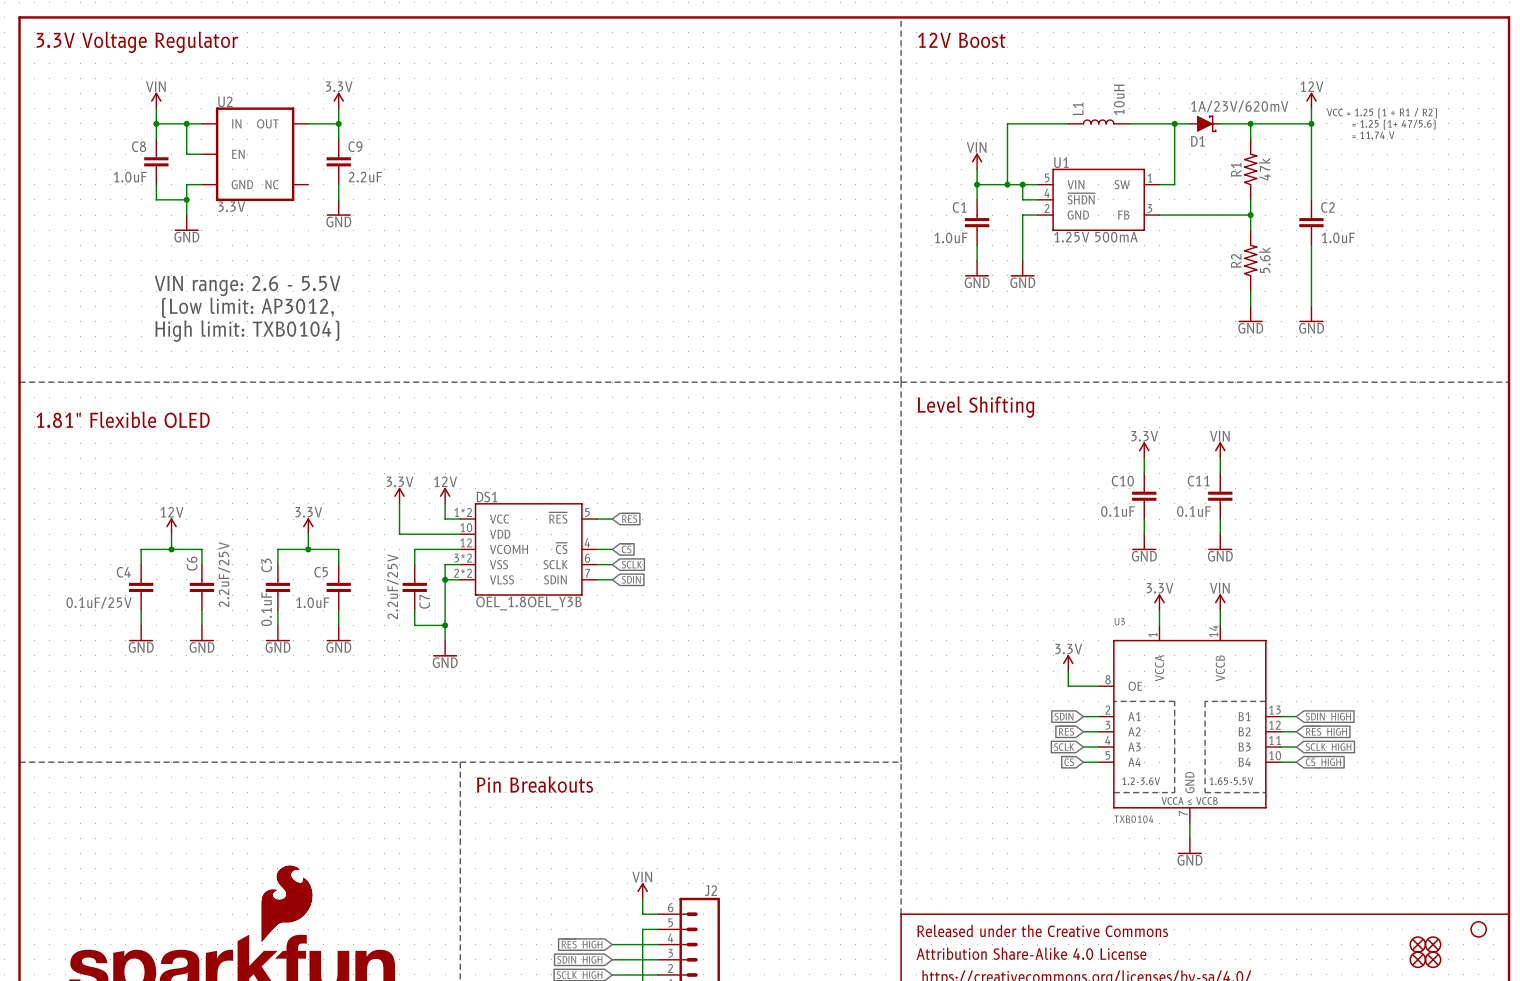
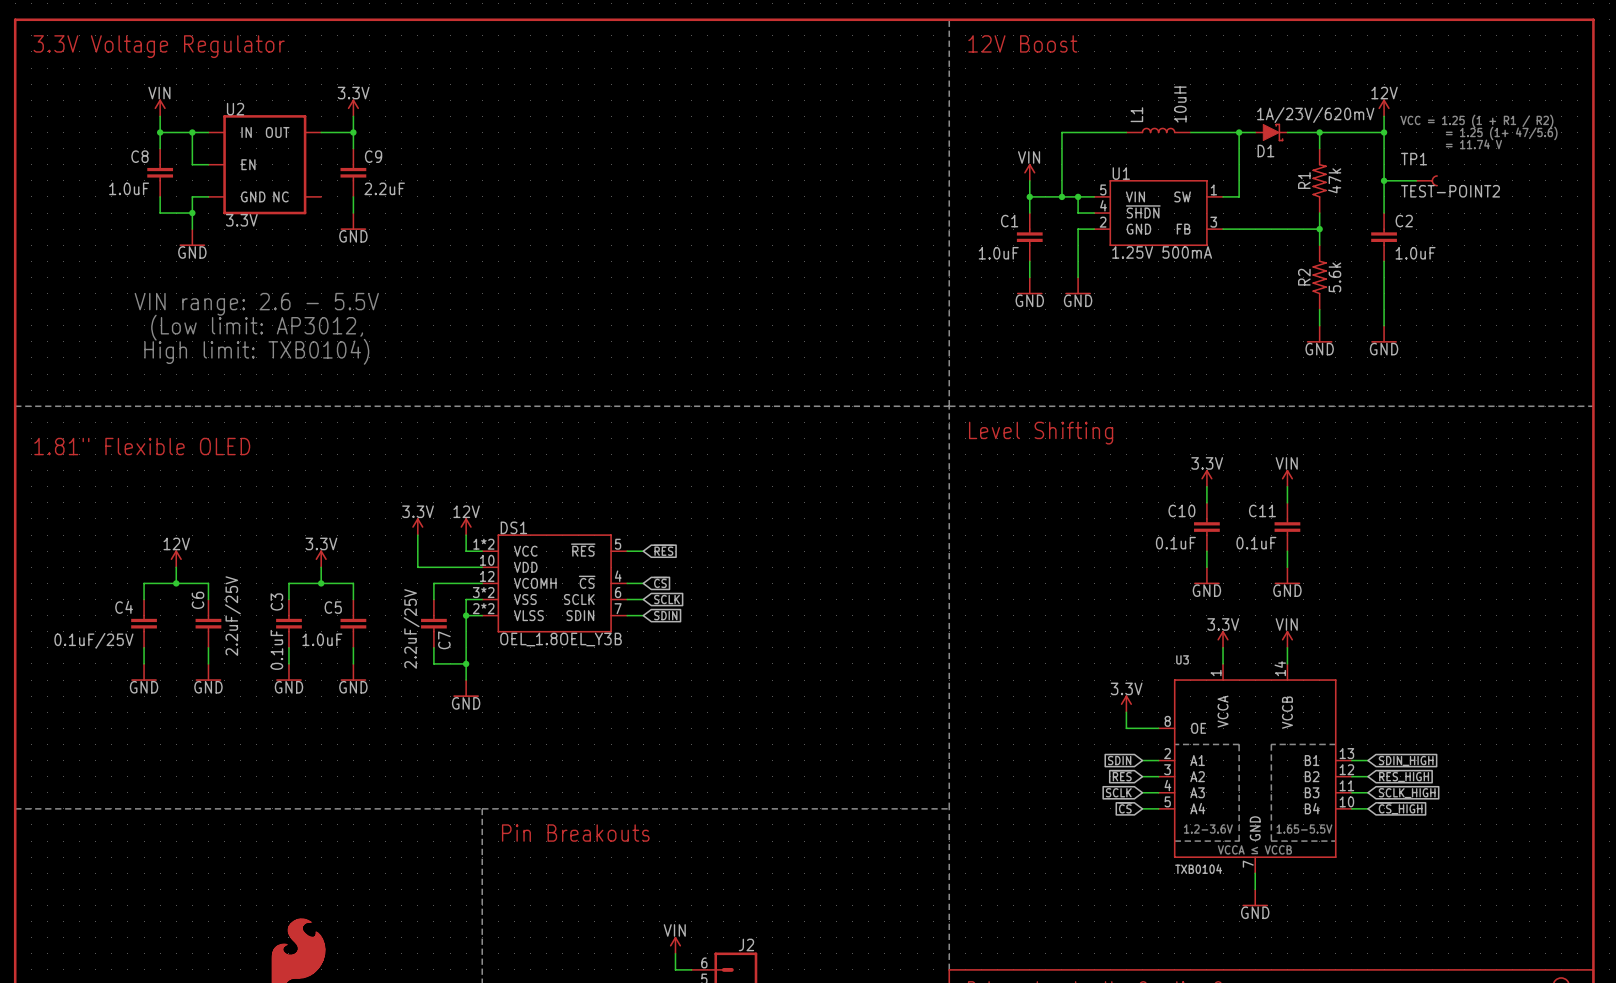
wire: none -> (1384, 180) (1416, 180)
junction: none -> (1384, 180)
TP1: none -> TEST-POINT2 (1426, 180)

